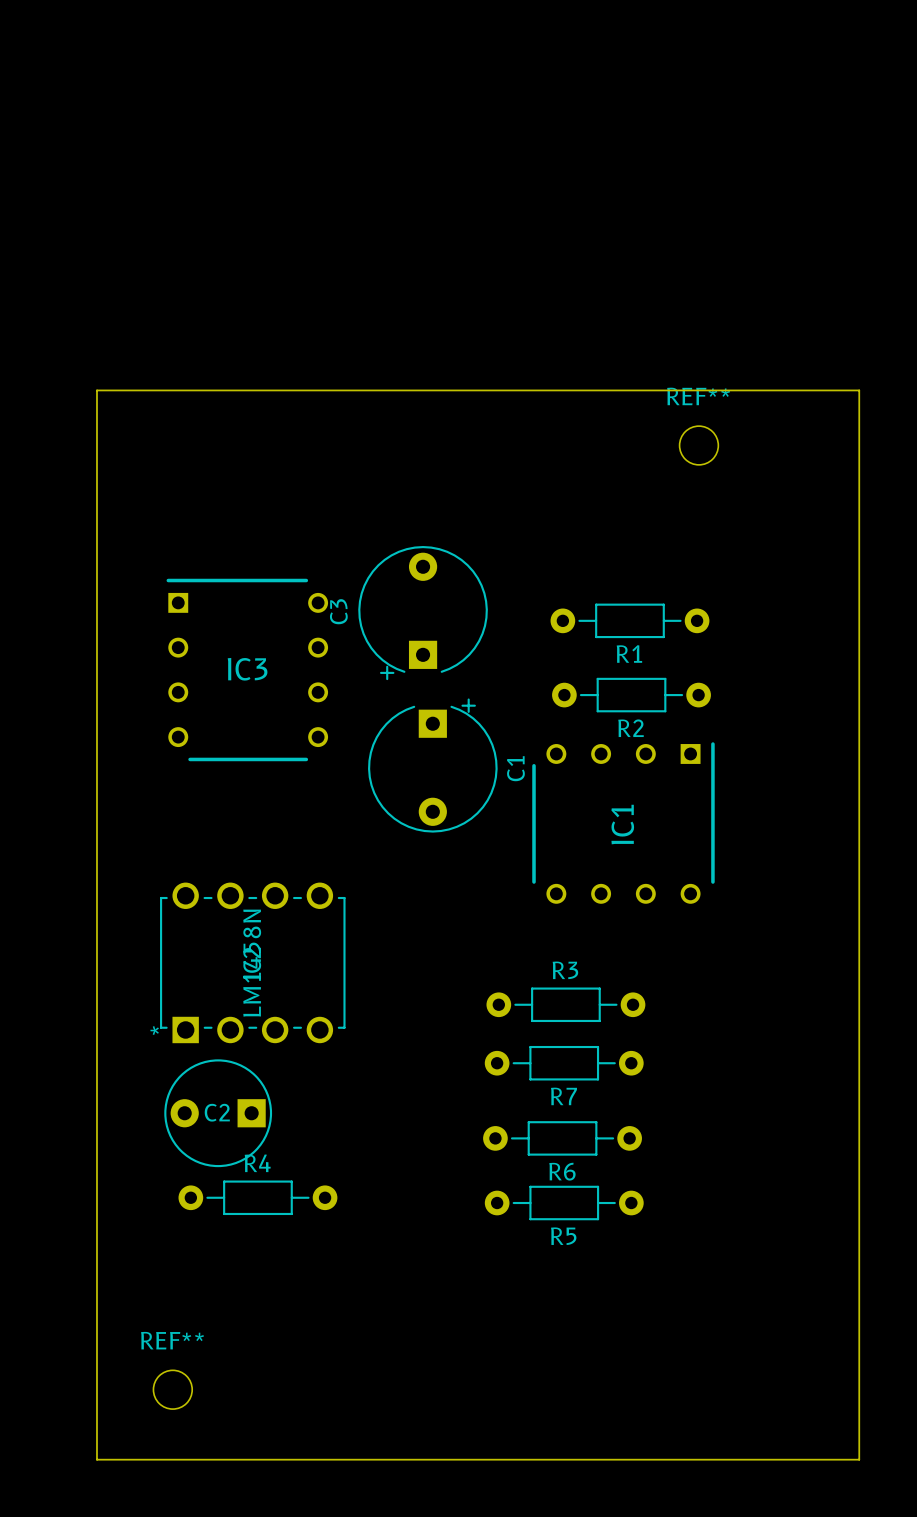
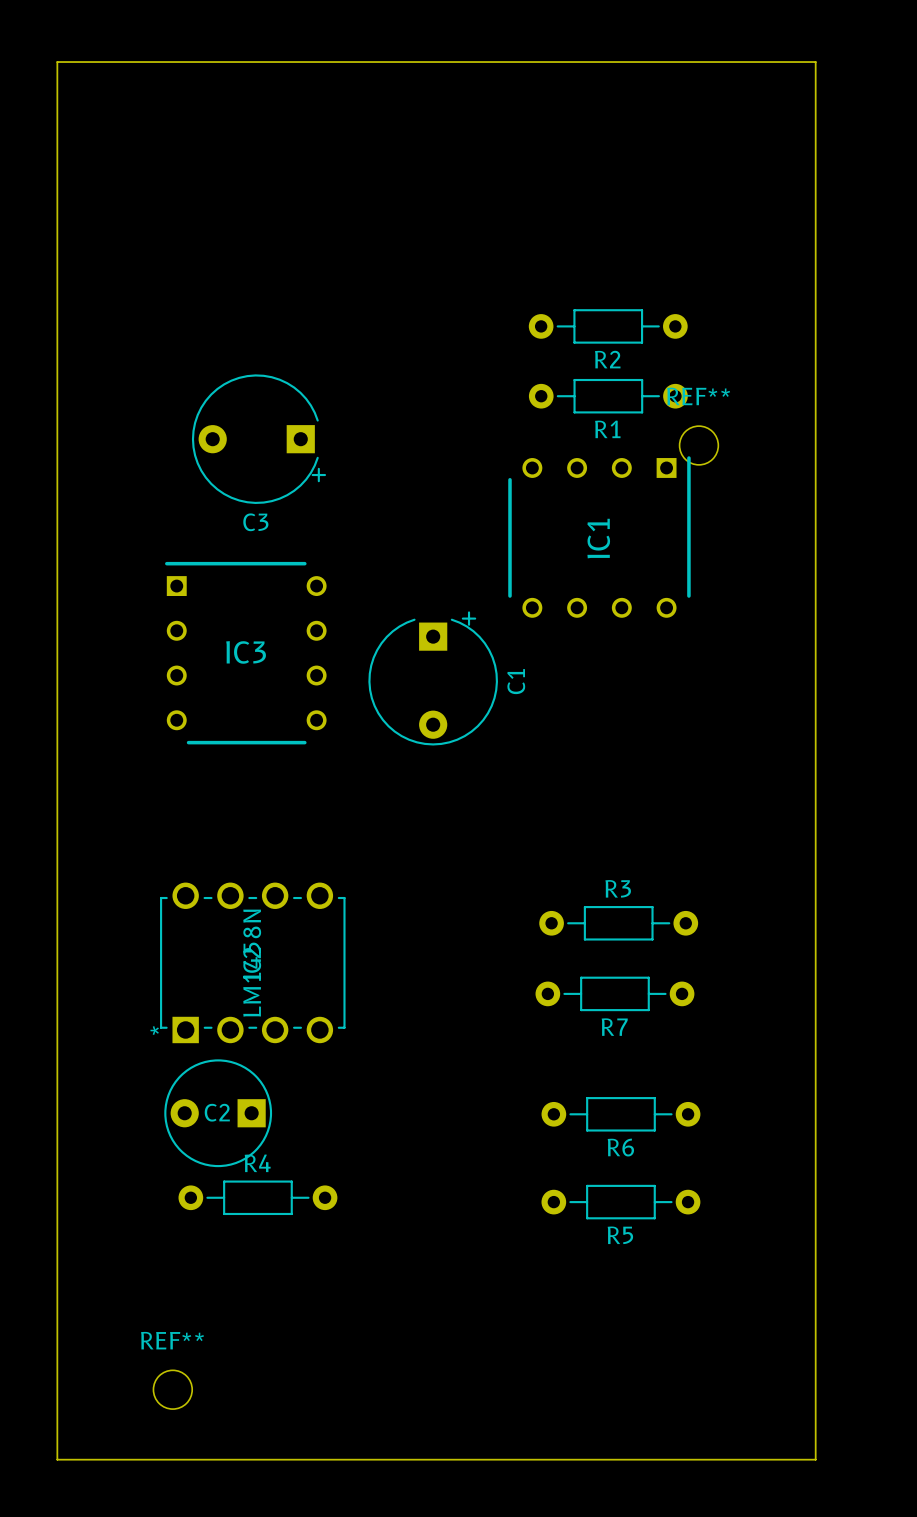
C3 rotation: 0° (423, 613) -> 90° counterclockwise (258, 439)
C3 position: (423, 613) -> (258, 439)
R1 position: (629, 620) -> (608, 396)
IC3 position: (247, 669) -> (245, 653)
R2 position: (631, 695) -> (608, 326)
C1 position: (432, 765) -> (433, 678)
IC1 position: (623, 823) -> (599, 537)
R3 position: (565, 1004) -> (618, 923)
R7 position: (564, 1063) -> (614, 993)
R6 position: (562, 1138) -> (620, 1114)
R5 position: (564, 1203) -> (620, 1202)
board edge: (96, 1459) (96, 390) (859, 390) (859, 1459) (815, 1459) -> (96, 1459) (57, 1459) (57, 62) (815, 62) (815, 1459)

